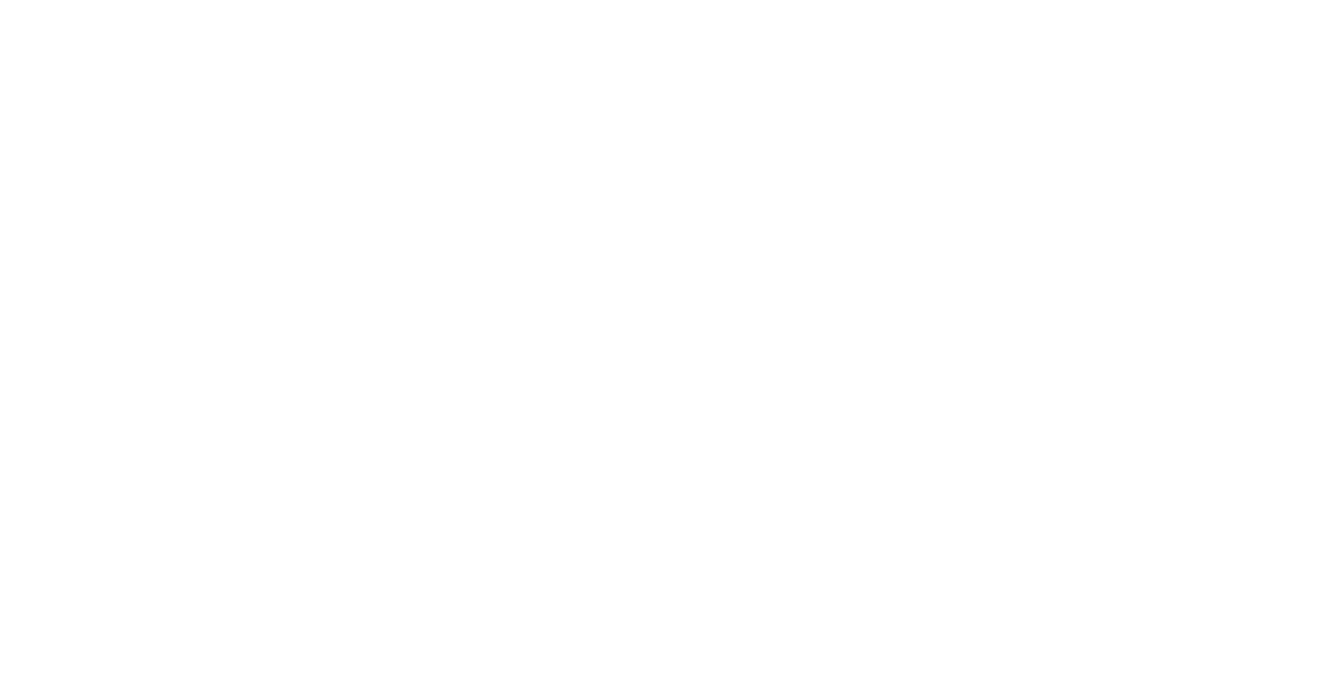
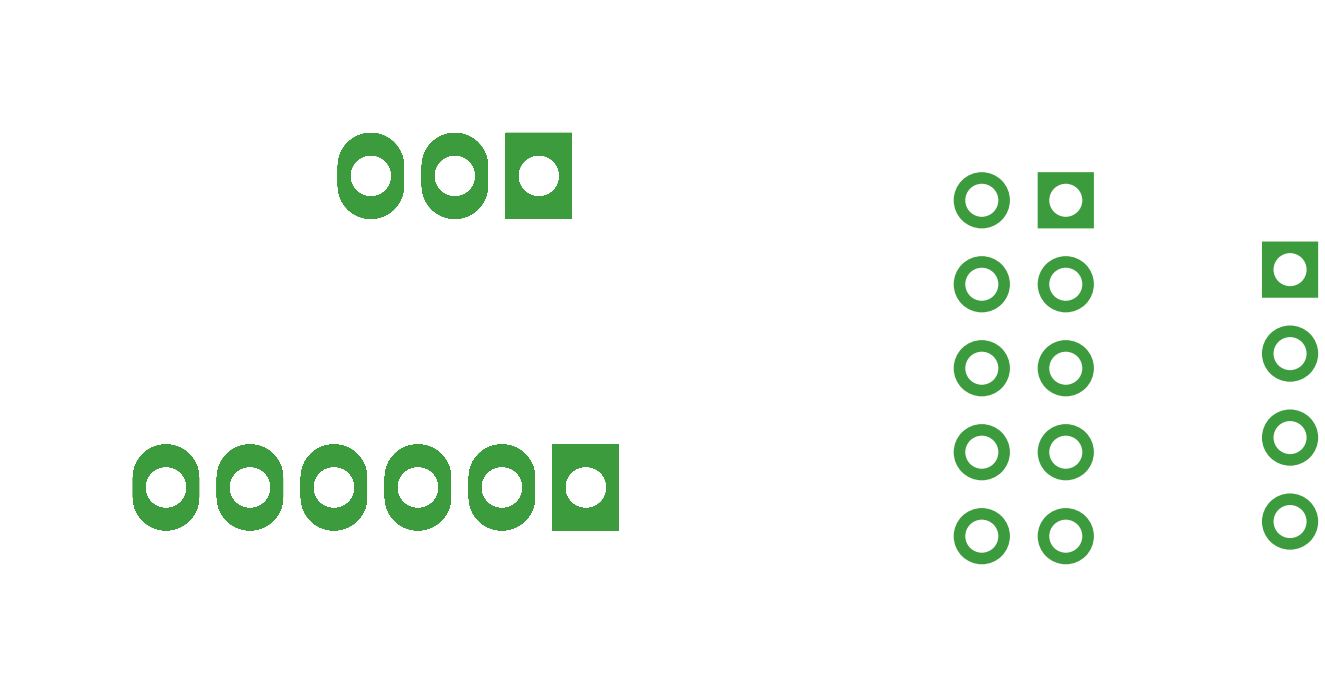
part: none -> (454, 175)
part: none -> (1023, 368)
part: none -> (1290, 395)
part: none -> (375, 487)
part: none -> (417, 487)
part: none -> (459, 487)

